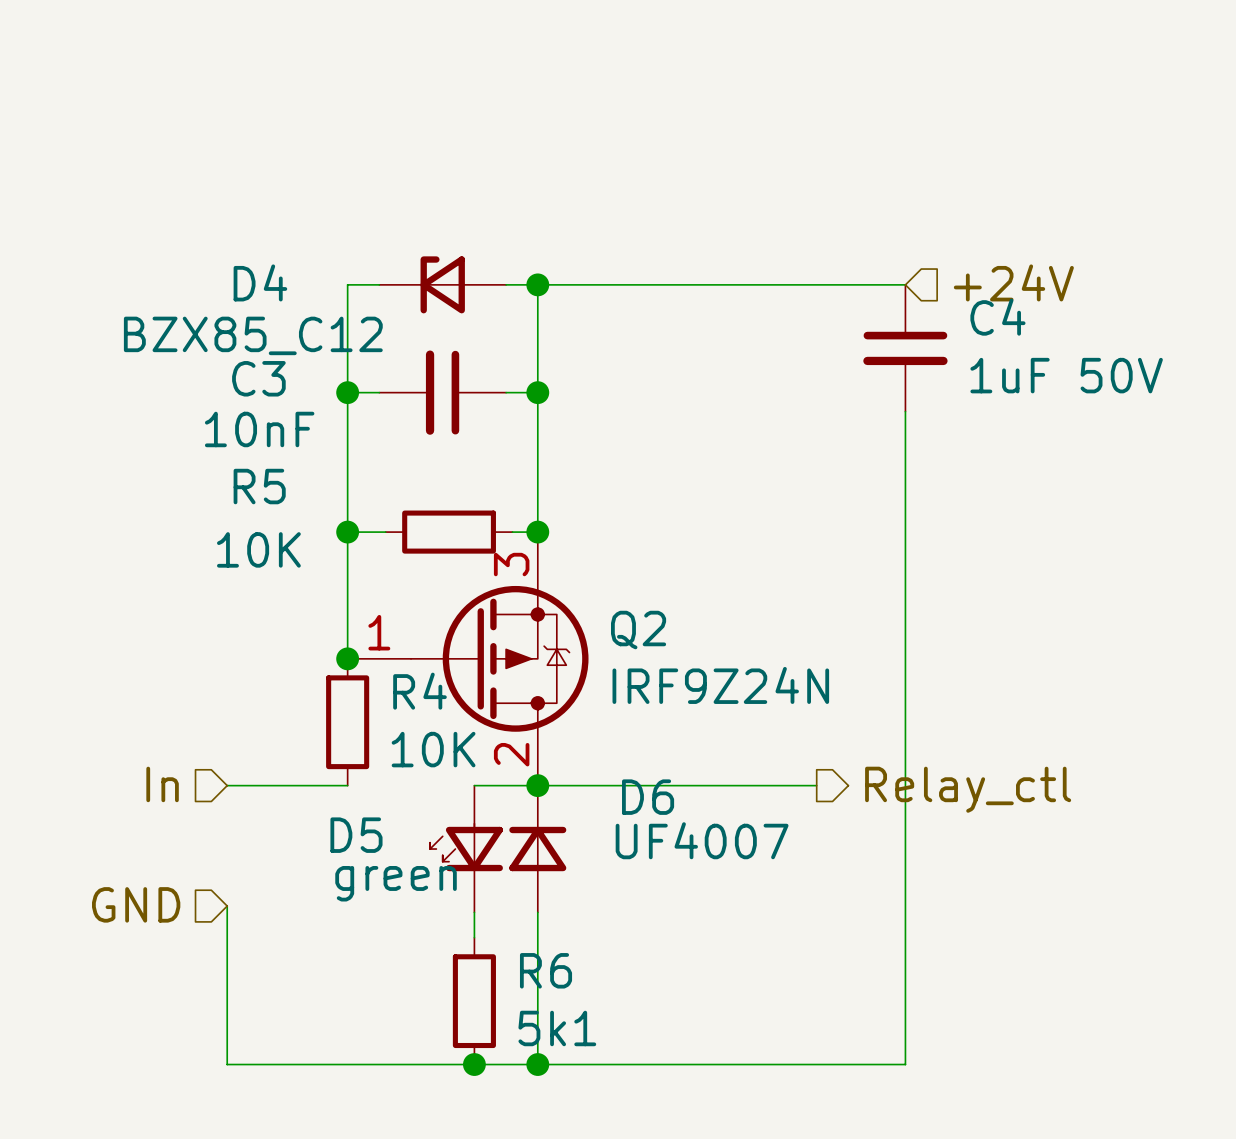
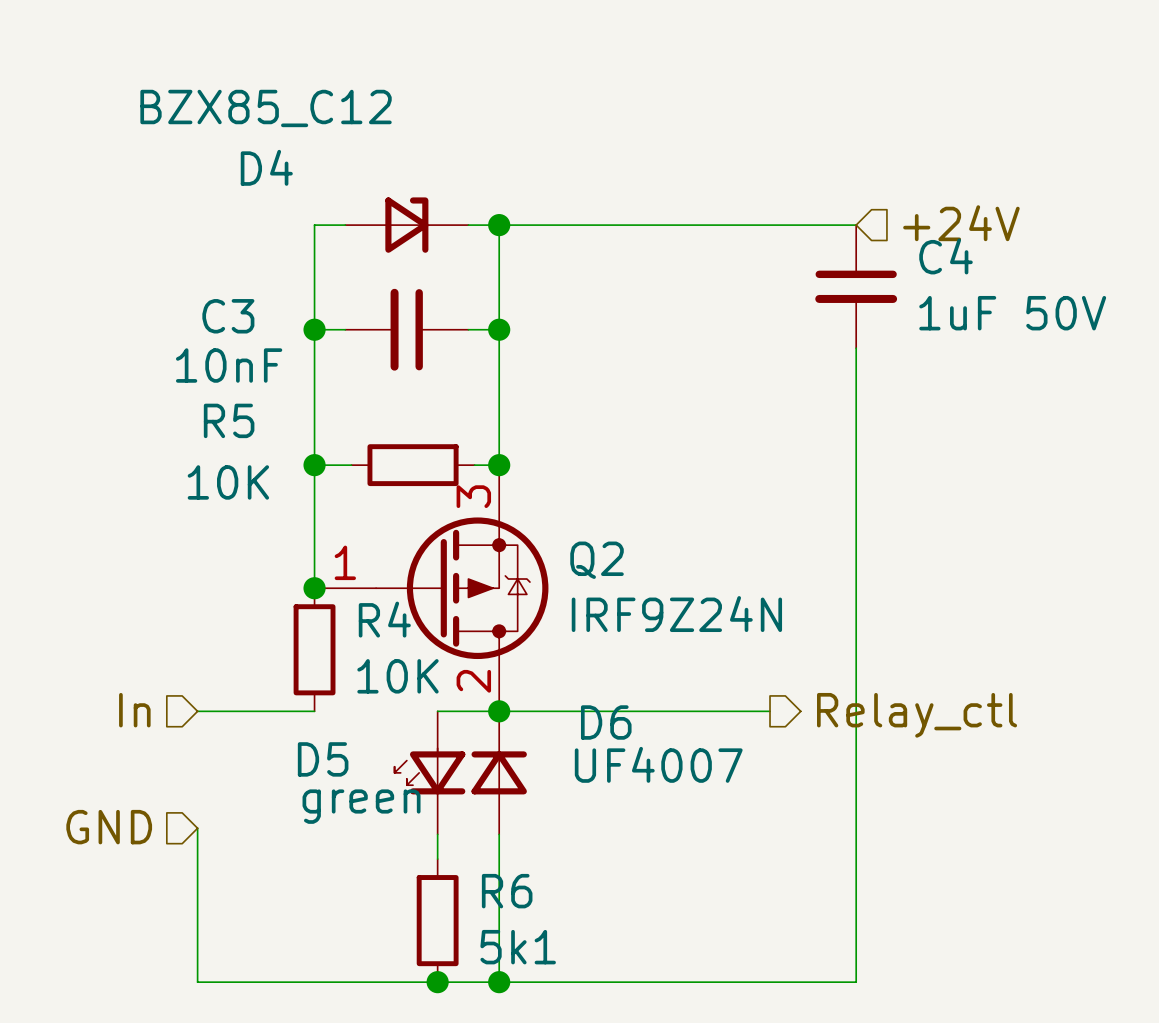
D4 name position: D4 (260, 282) -> D4 (266, 167)
D4 flip: as is (442, 284) -> left-right (406, 225)
D4 value position: BZX85_C12 (253, 335) -> BZX85_C12 (266, 108)

